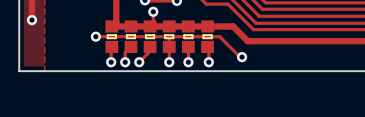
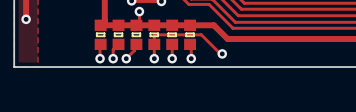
track: (95, 36) (170, 36) -> none
via: (95, 36) -> none

